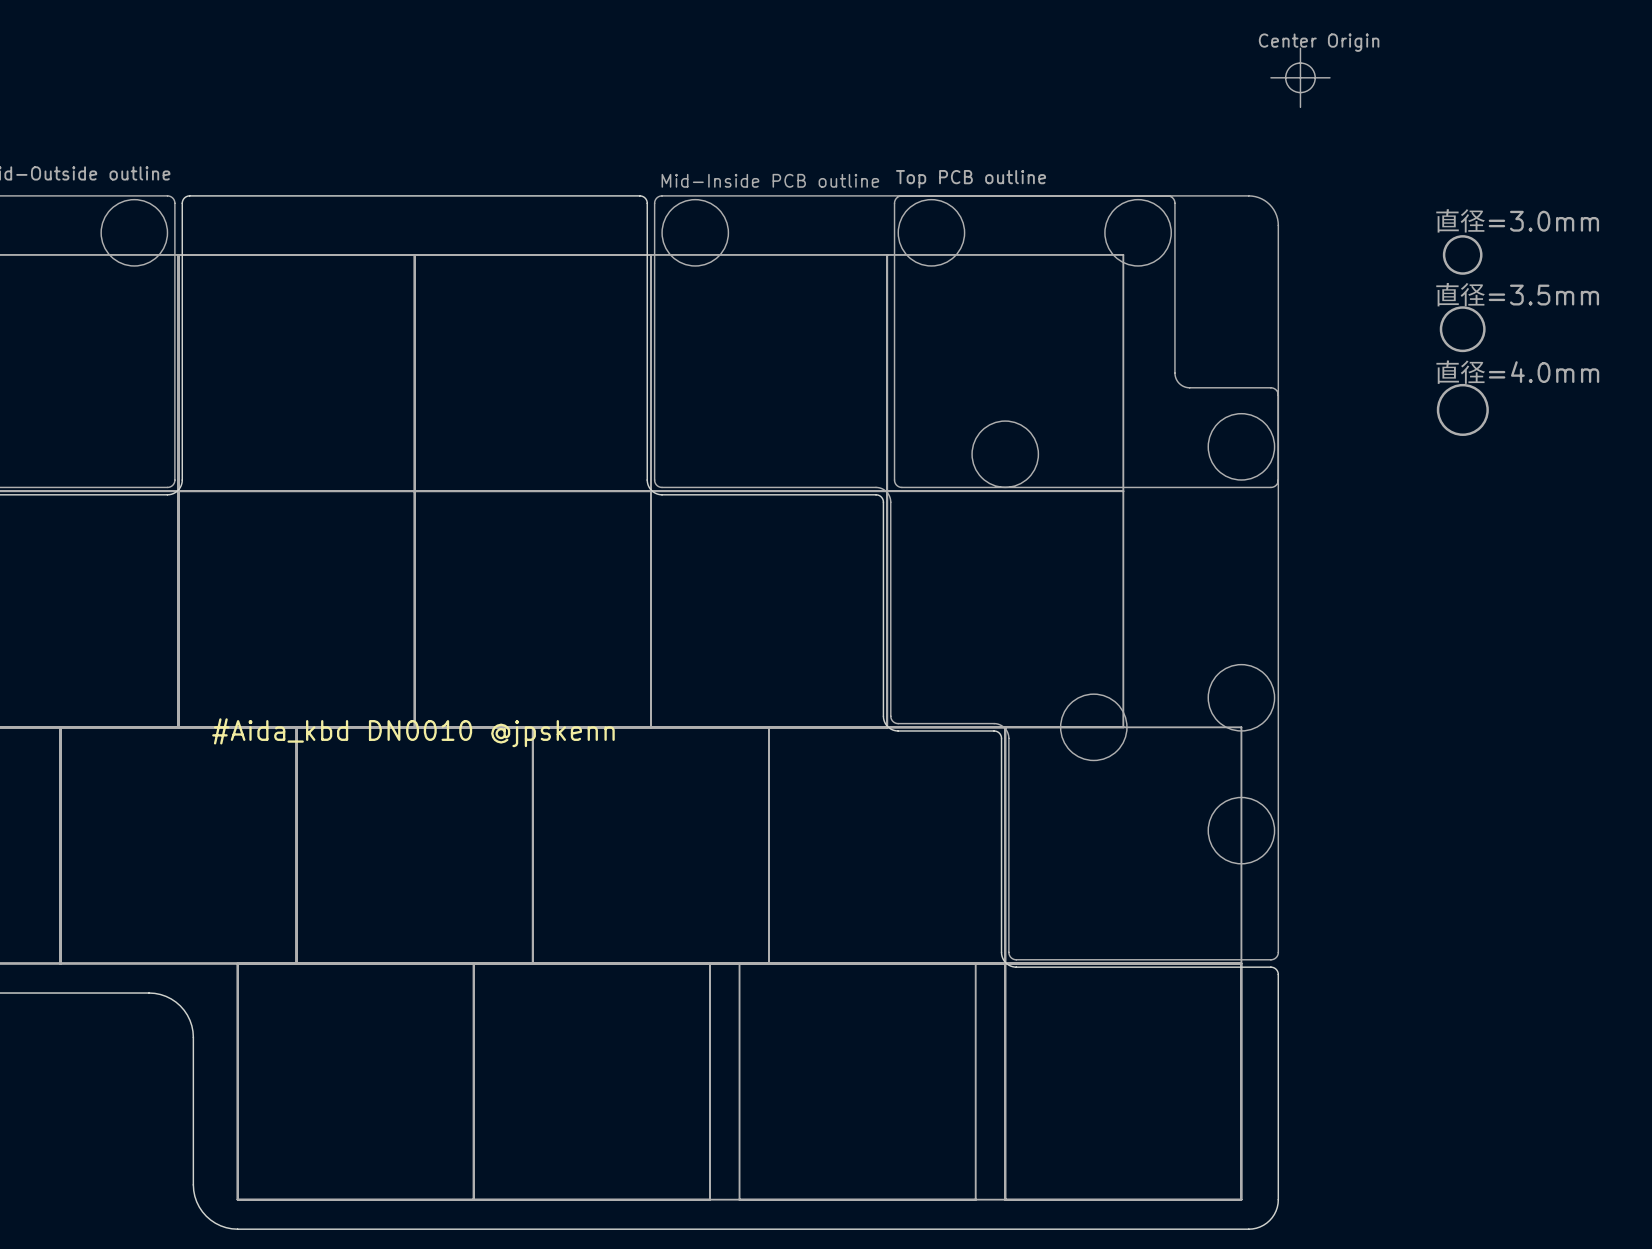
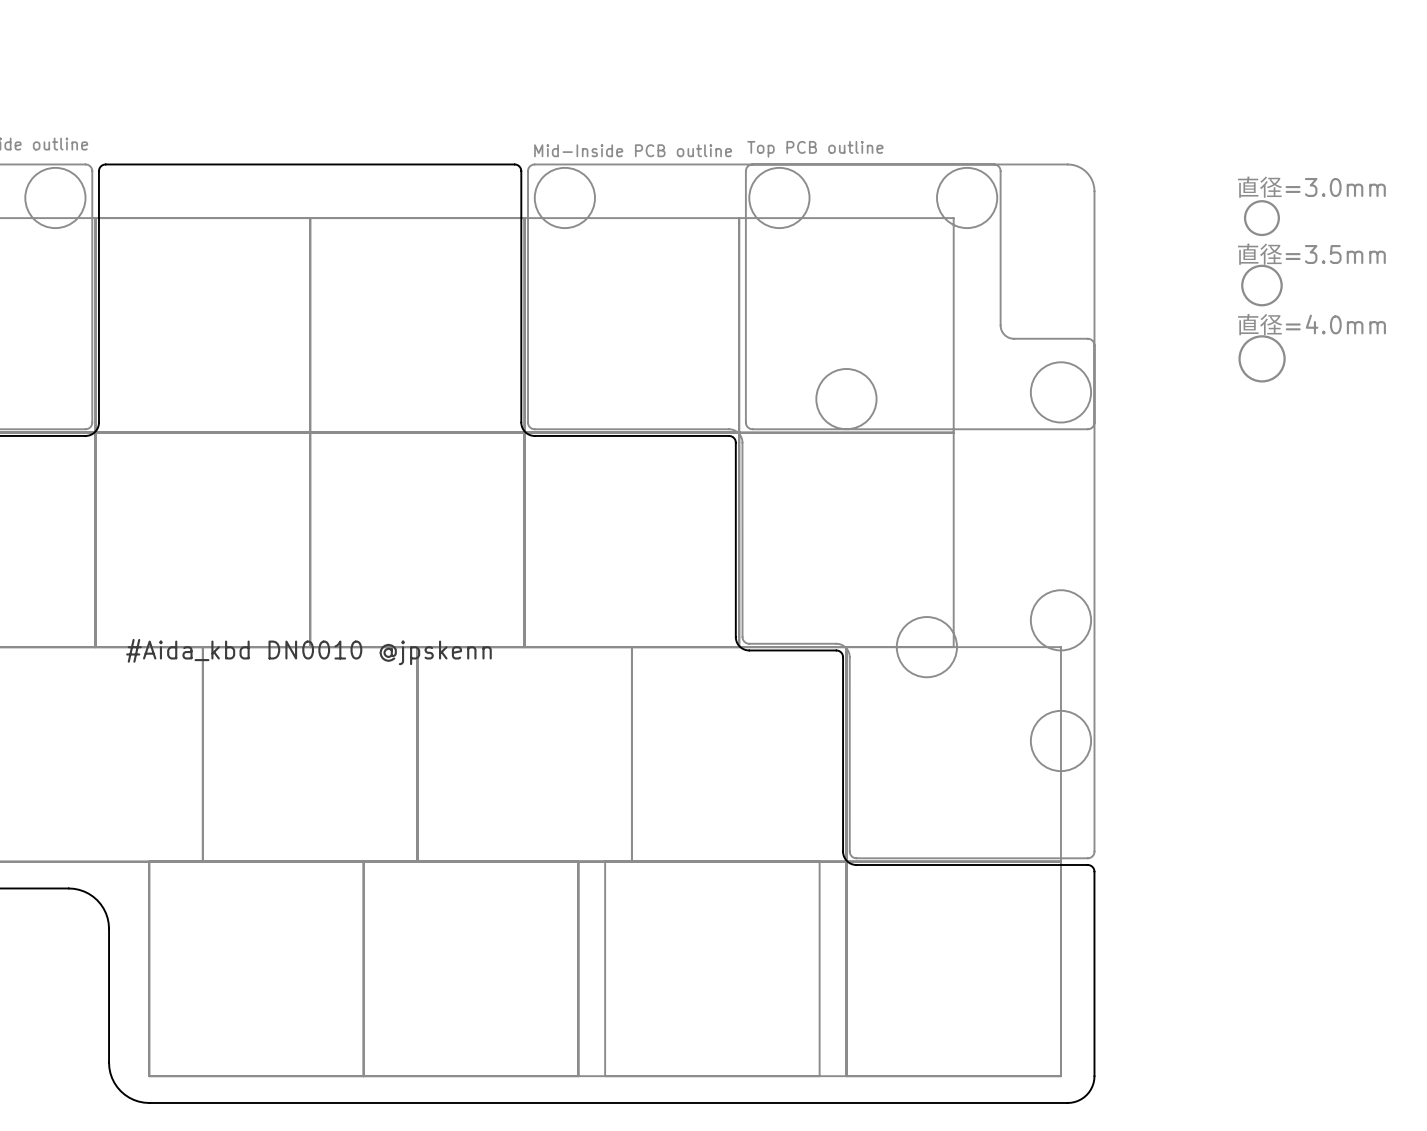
text: Center Origin (1319, 42) -> none
line: (1300, 48) (1300, 107) -> none
drawing: [1285, 62, 1316, 94] -> none
line: (1270, 77) (1329, 77) -> none

